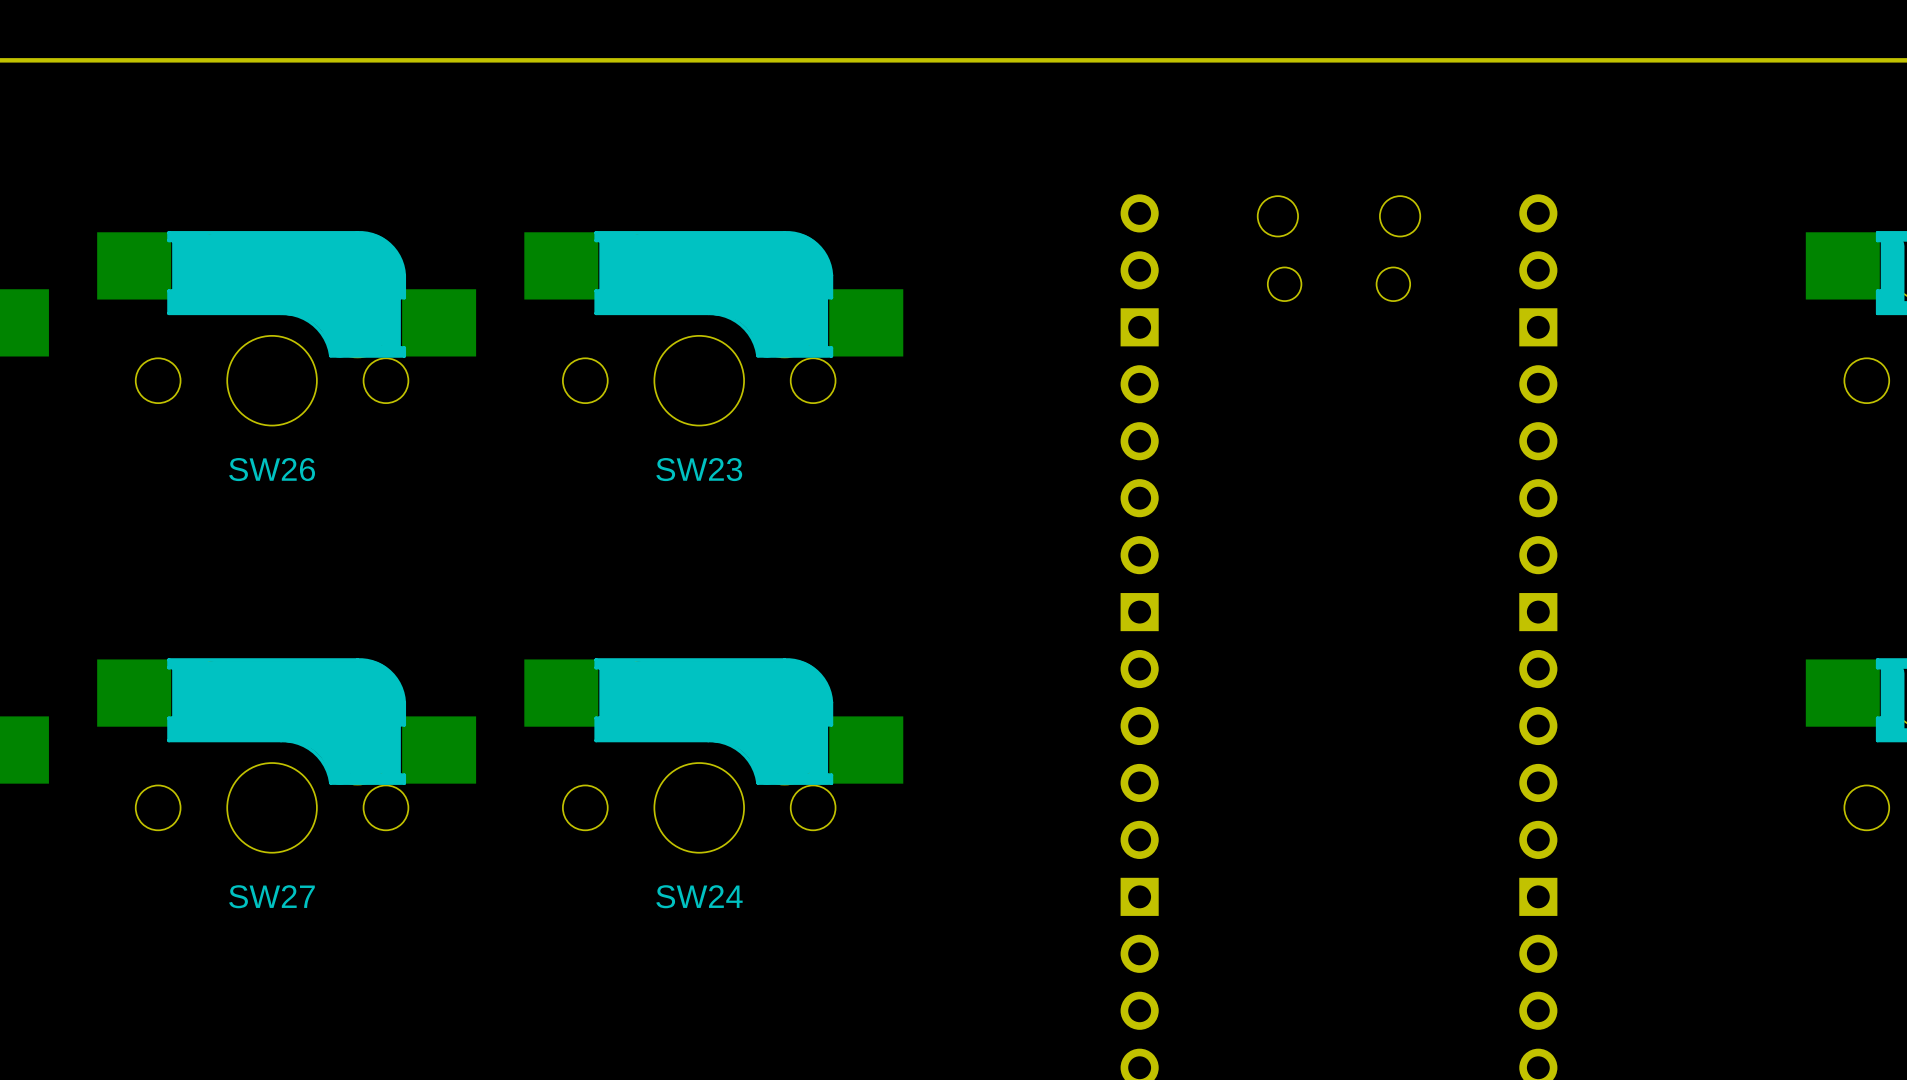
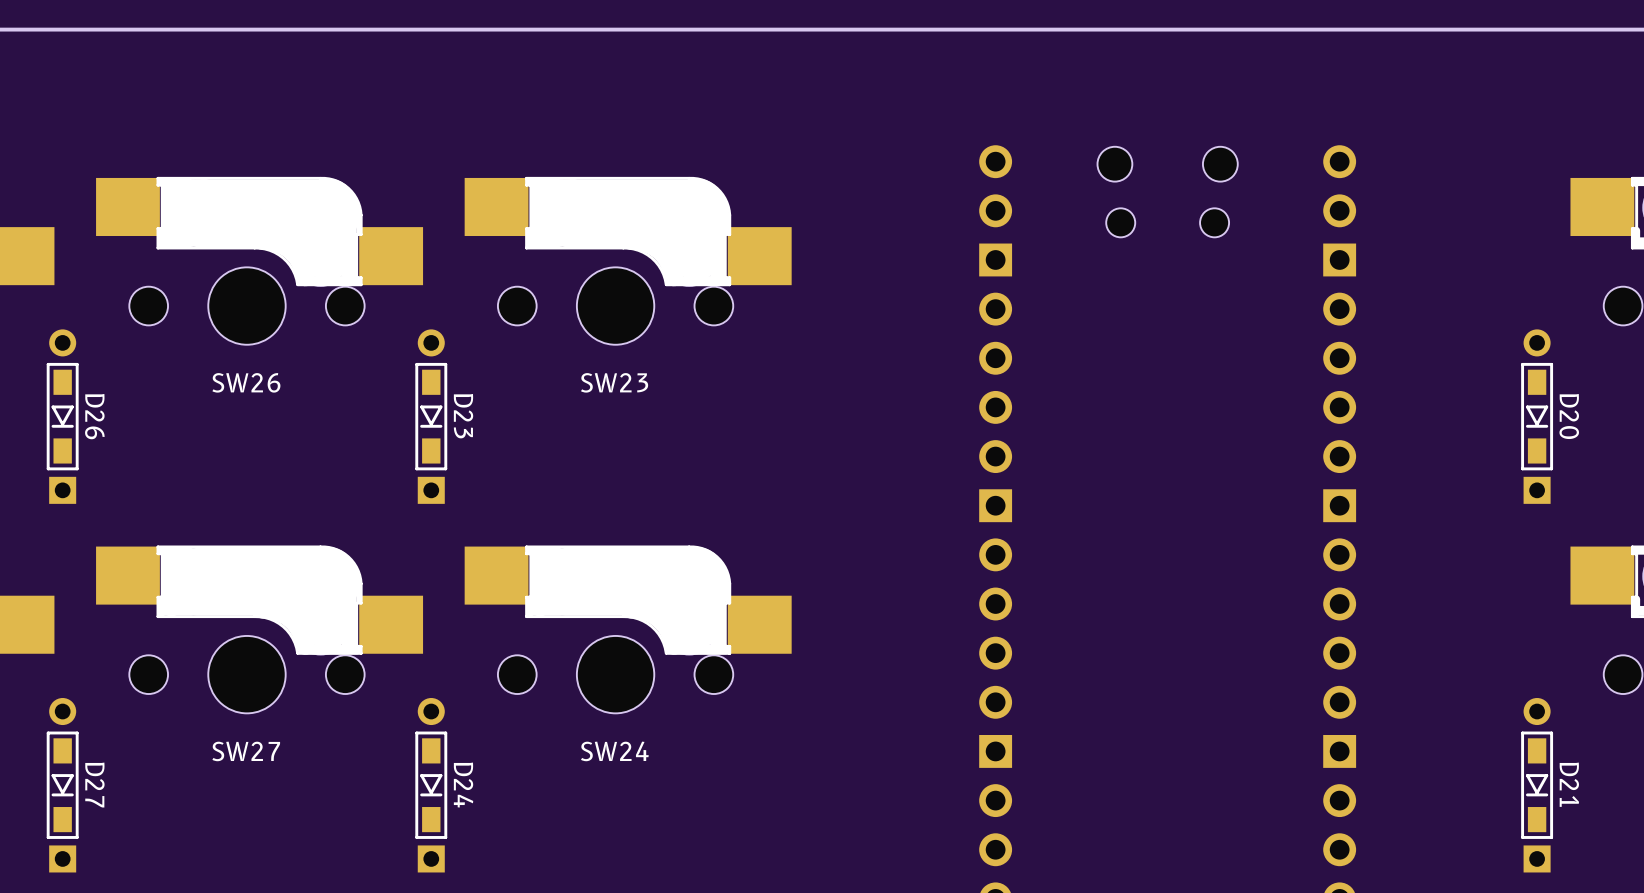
D26: none -> (62, 416)
D23: none -> (431, 416)
D20: none -> (1537, 416)
D27: none -> (62, 785)
D24: none -> (431, 785)
D21: none -> (1537, 785)

